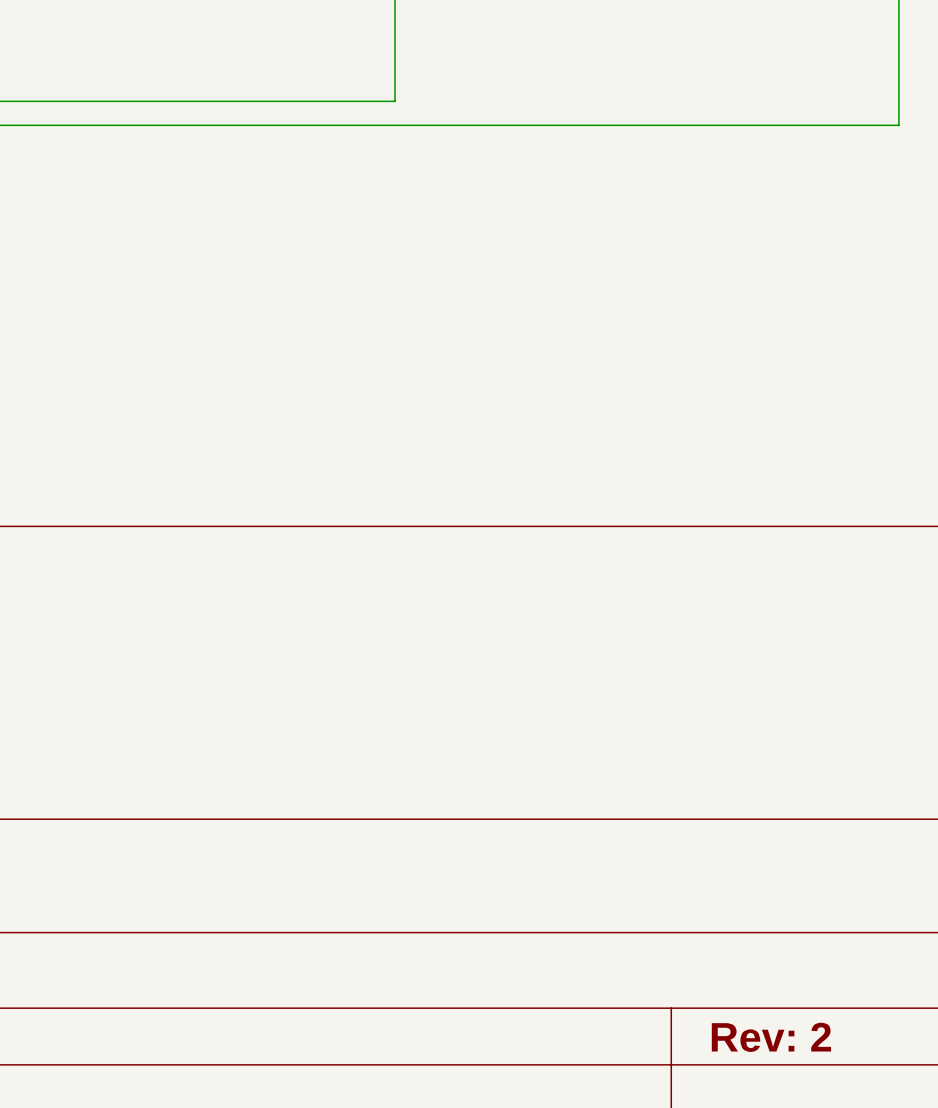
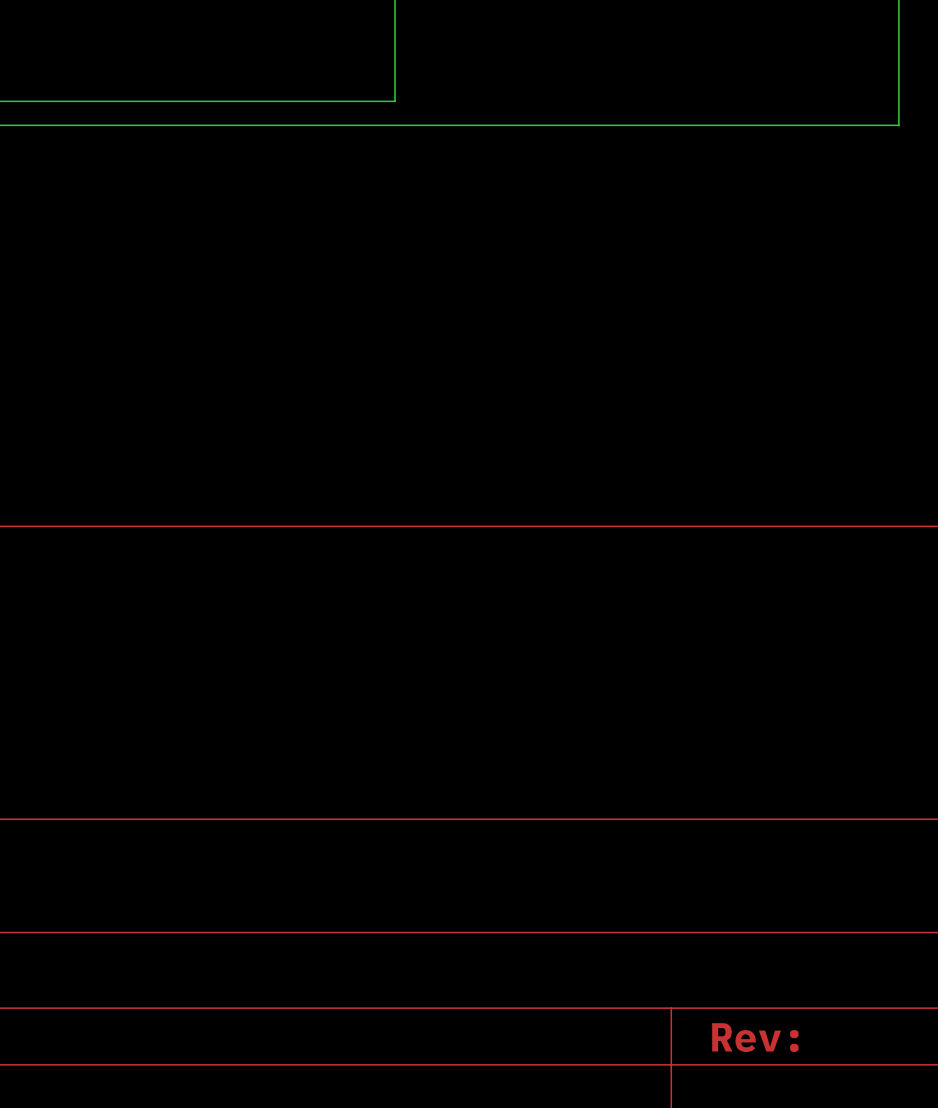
title block: Rev: 2 (771, 1037) -> Rev: (755, 1037)

